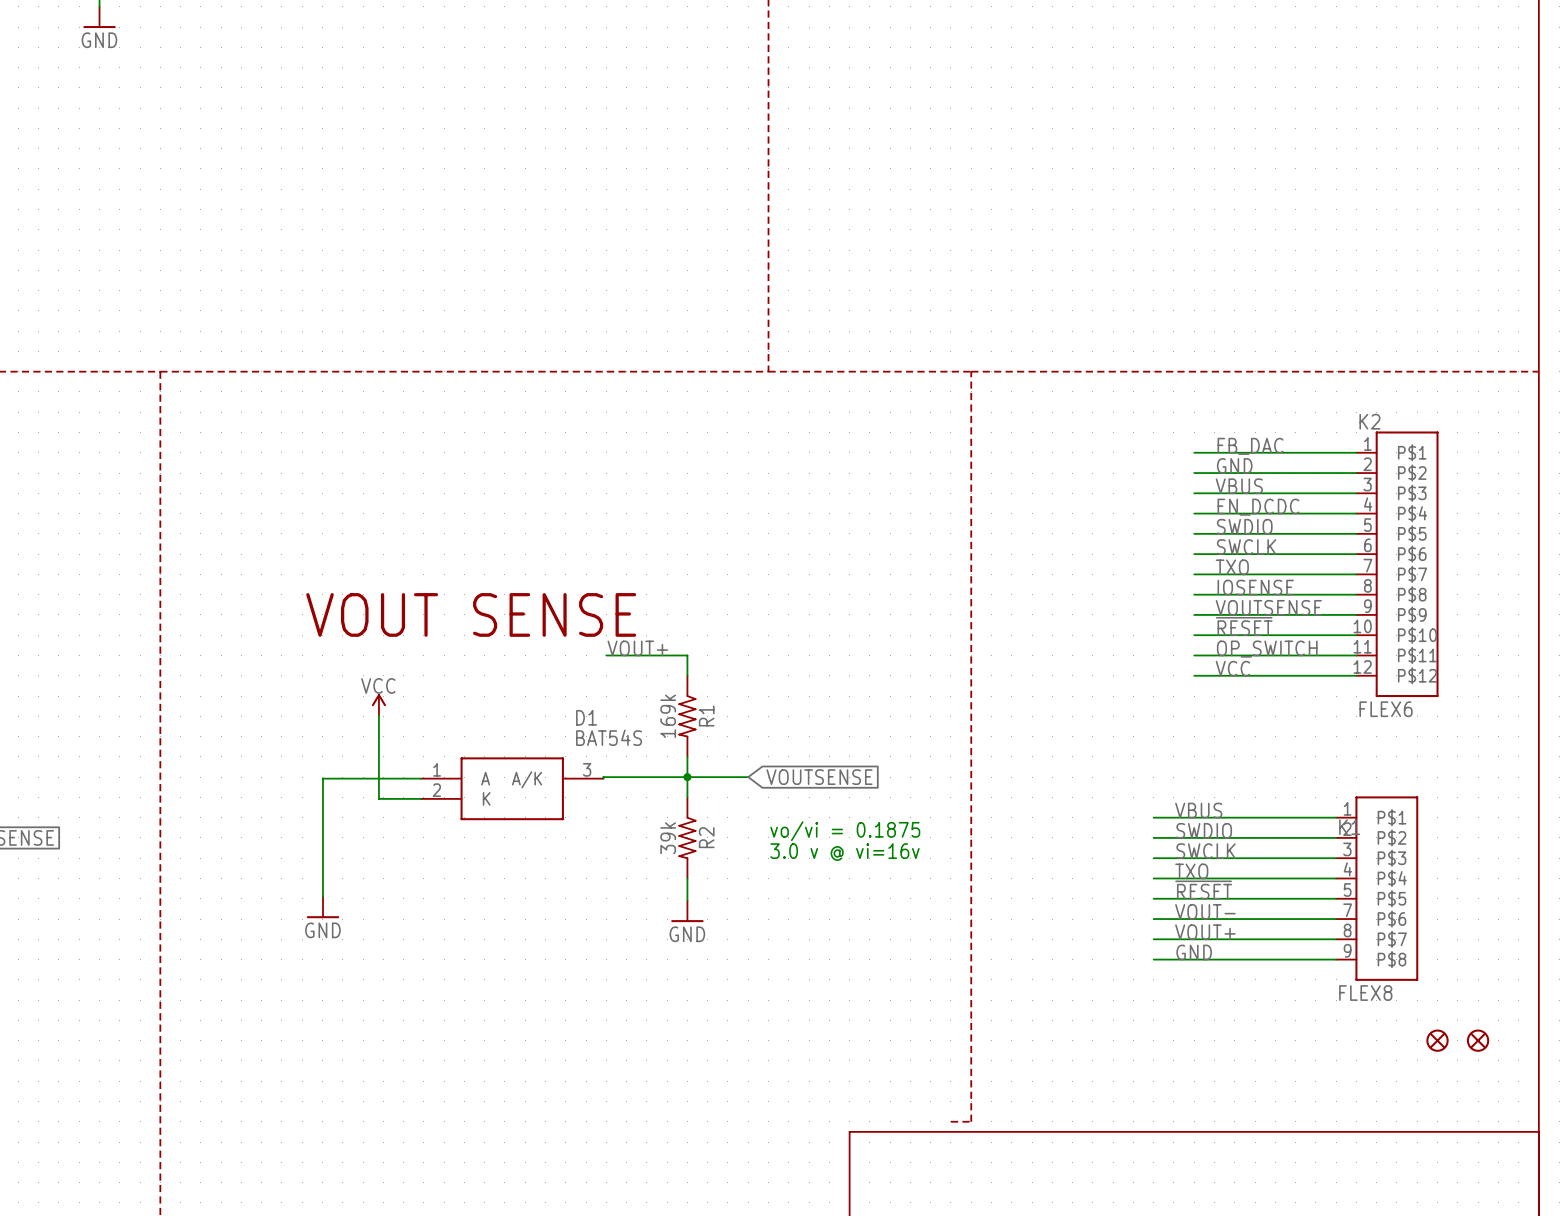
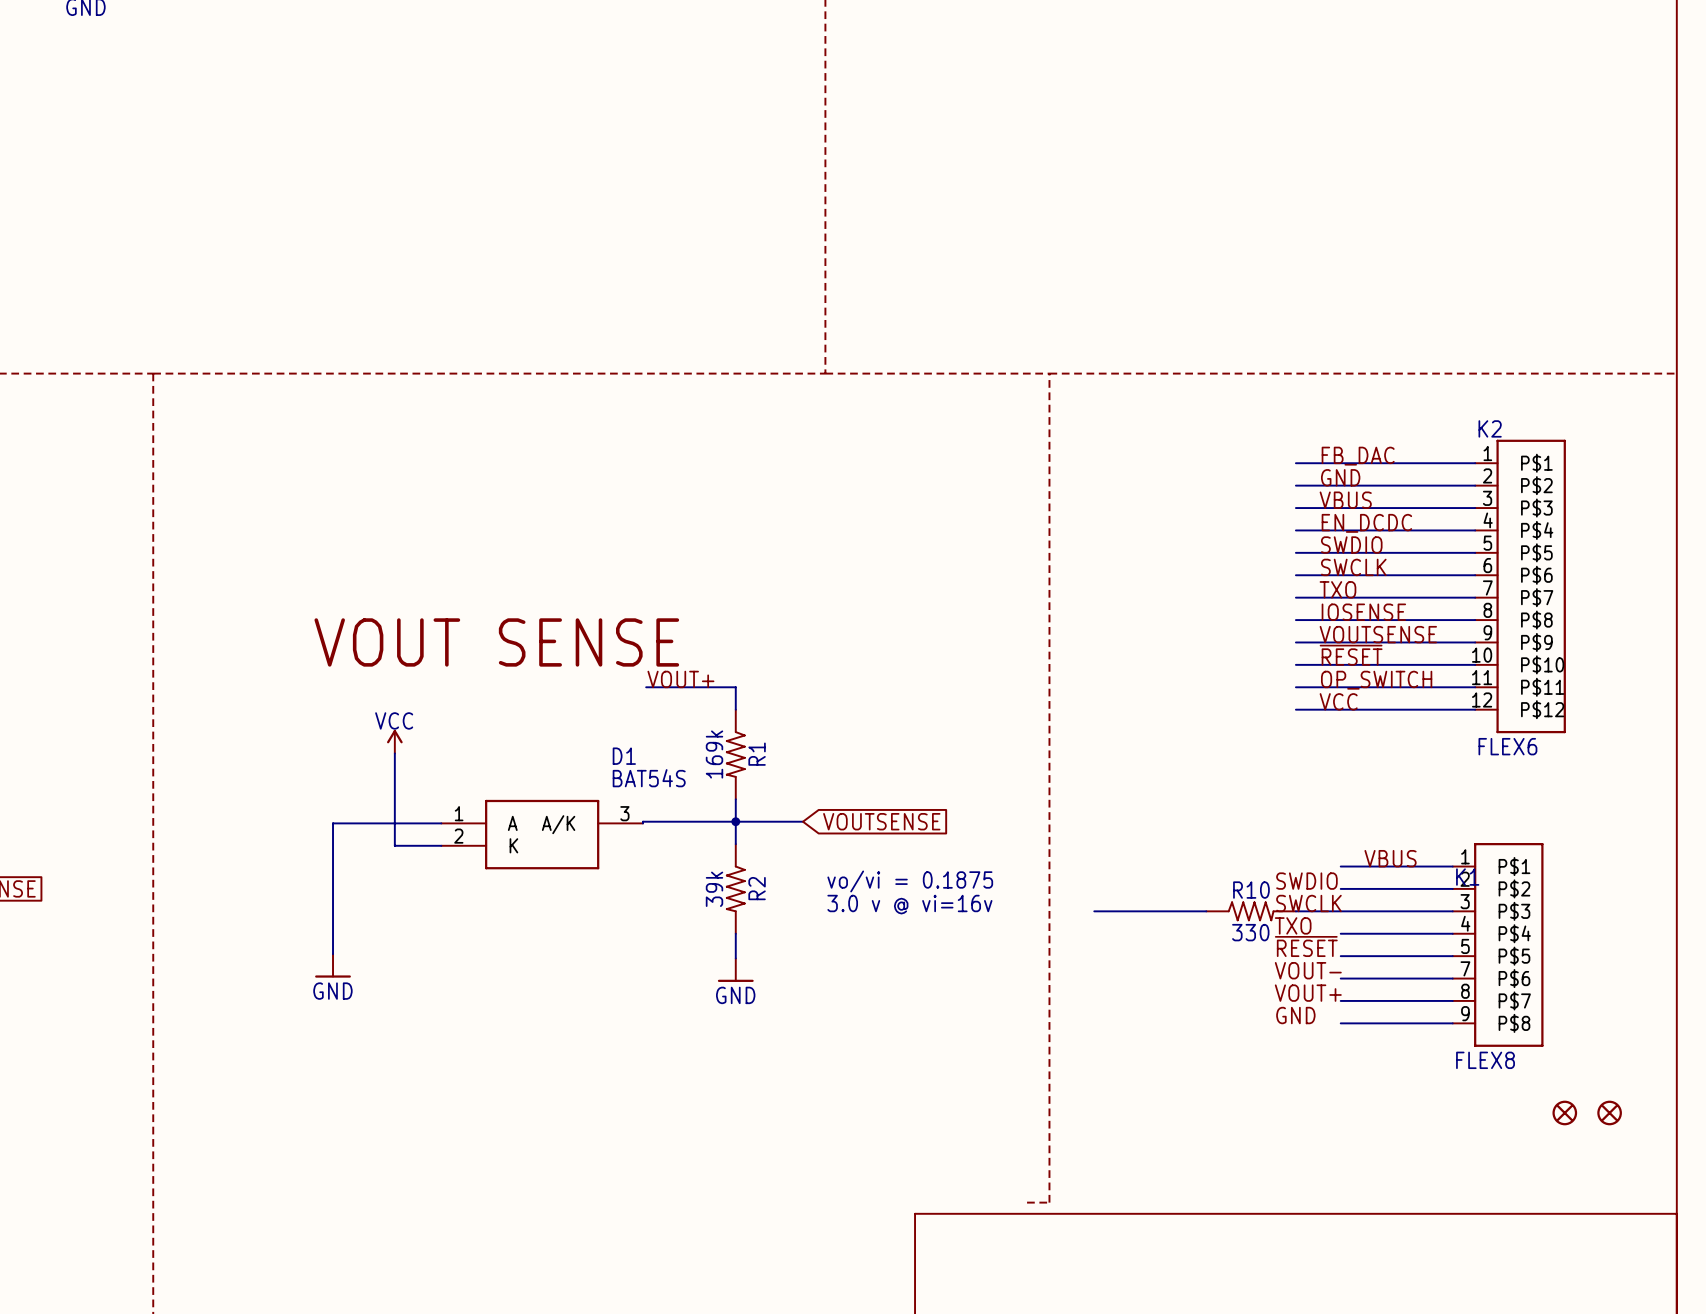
label position: VBUS (1198, 810) -> VBUS (1390, 858)
wire: (1153, 817) (1234, 817) -> none
wire: (1153, 837) (1234, 837) -> none
wire: none -> (1094, 911) (1206, 911)
R10: none -> 330 (1251, 911)
wire: (1153, 878) (1234, 878) -> none
wire: (1153, 898) (1234, 898) -> none
wire: (1153, 919) (1234, 919) -> none
wire: (1153, 939) (1234, 939) -> none
wire: (1153, 959) (1234, 959) -> none

